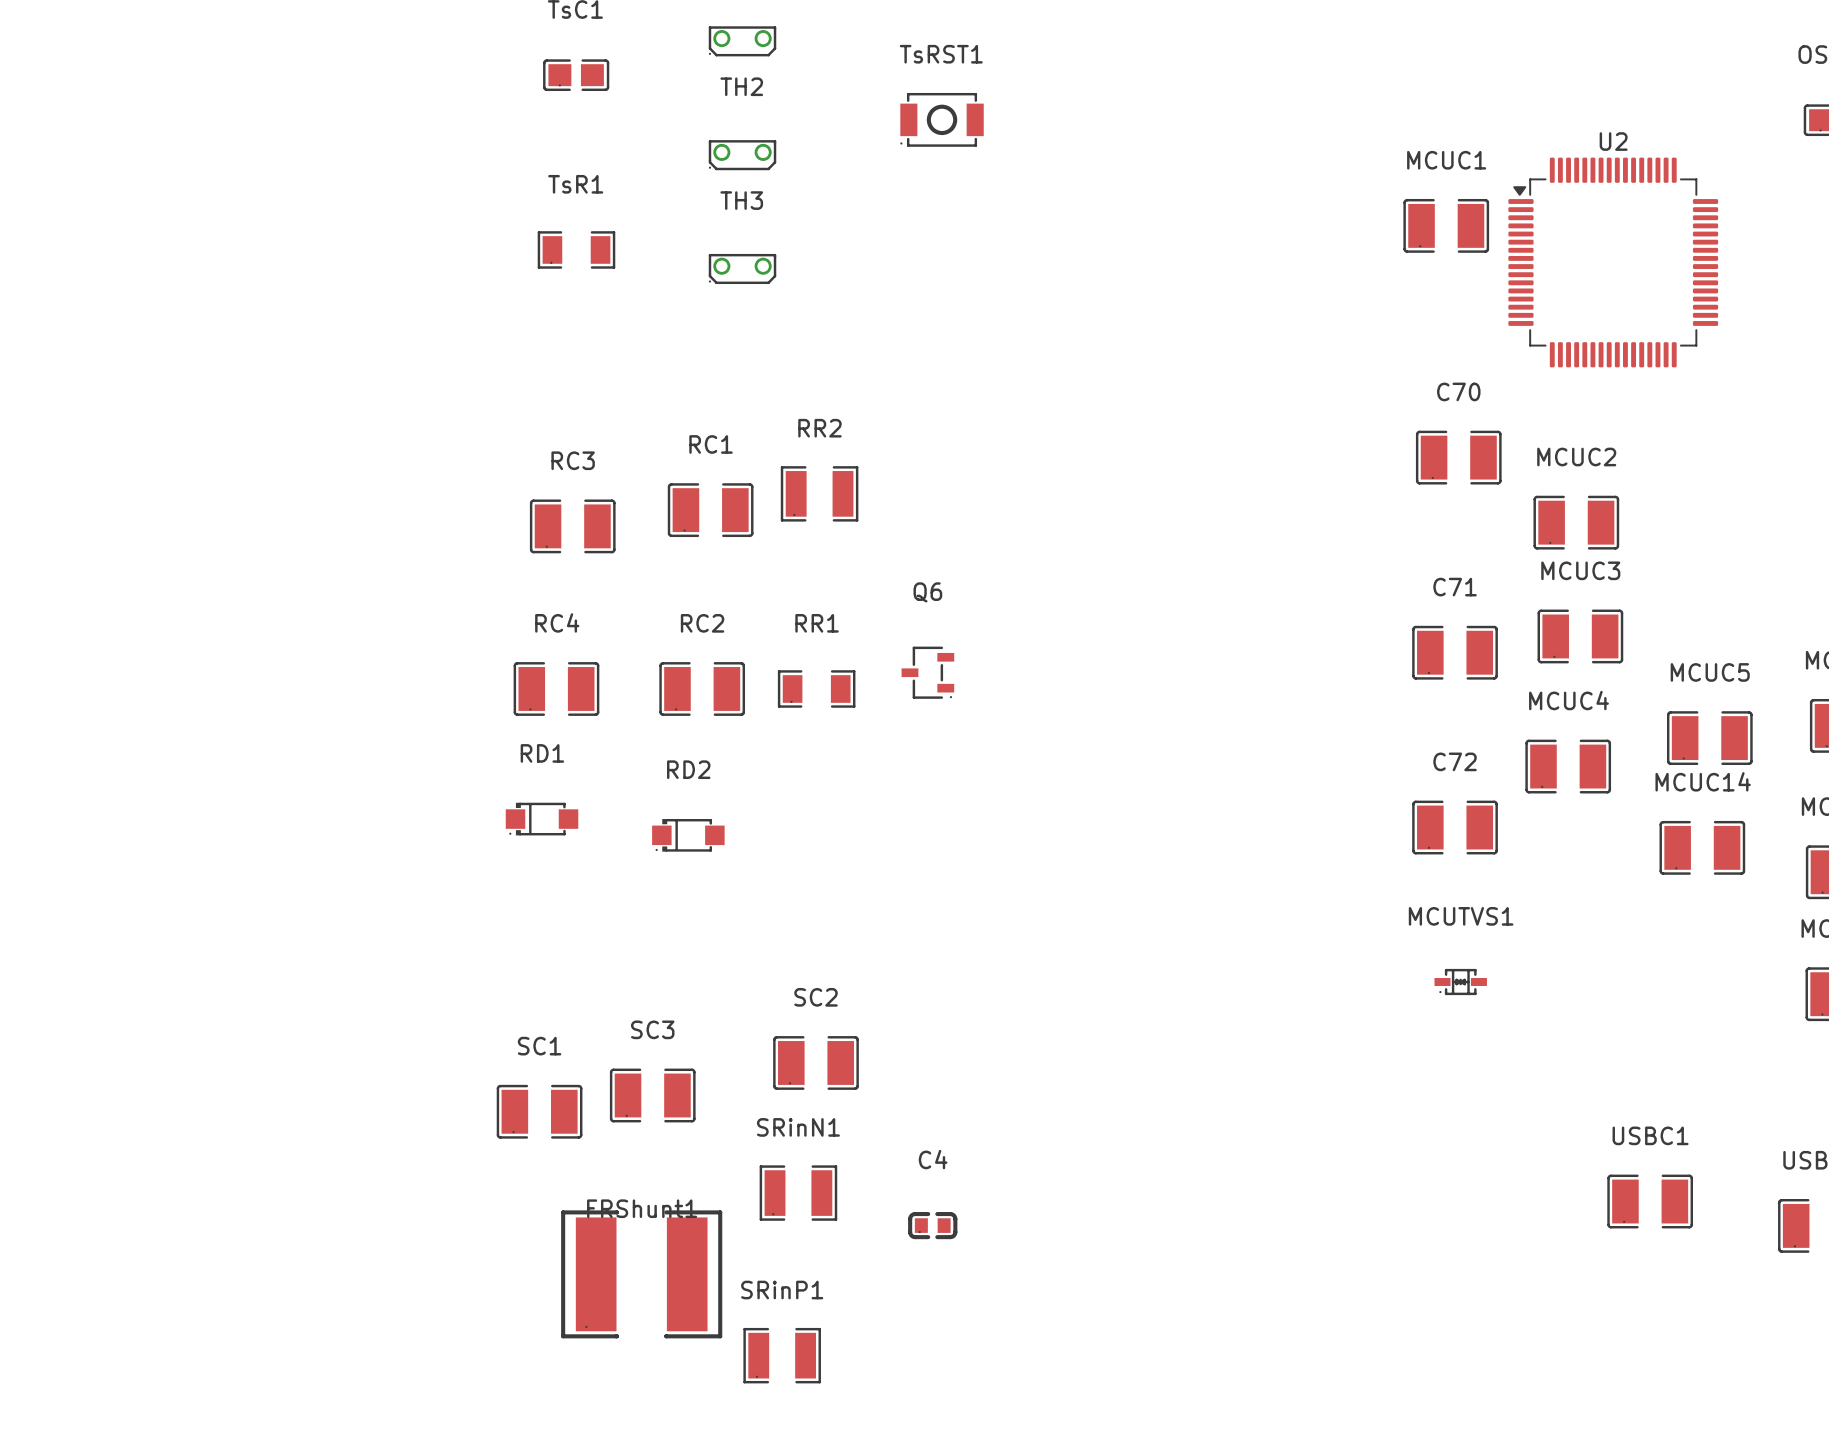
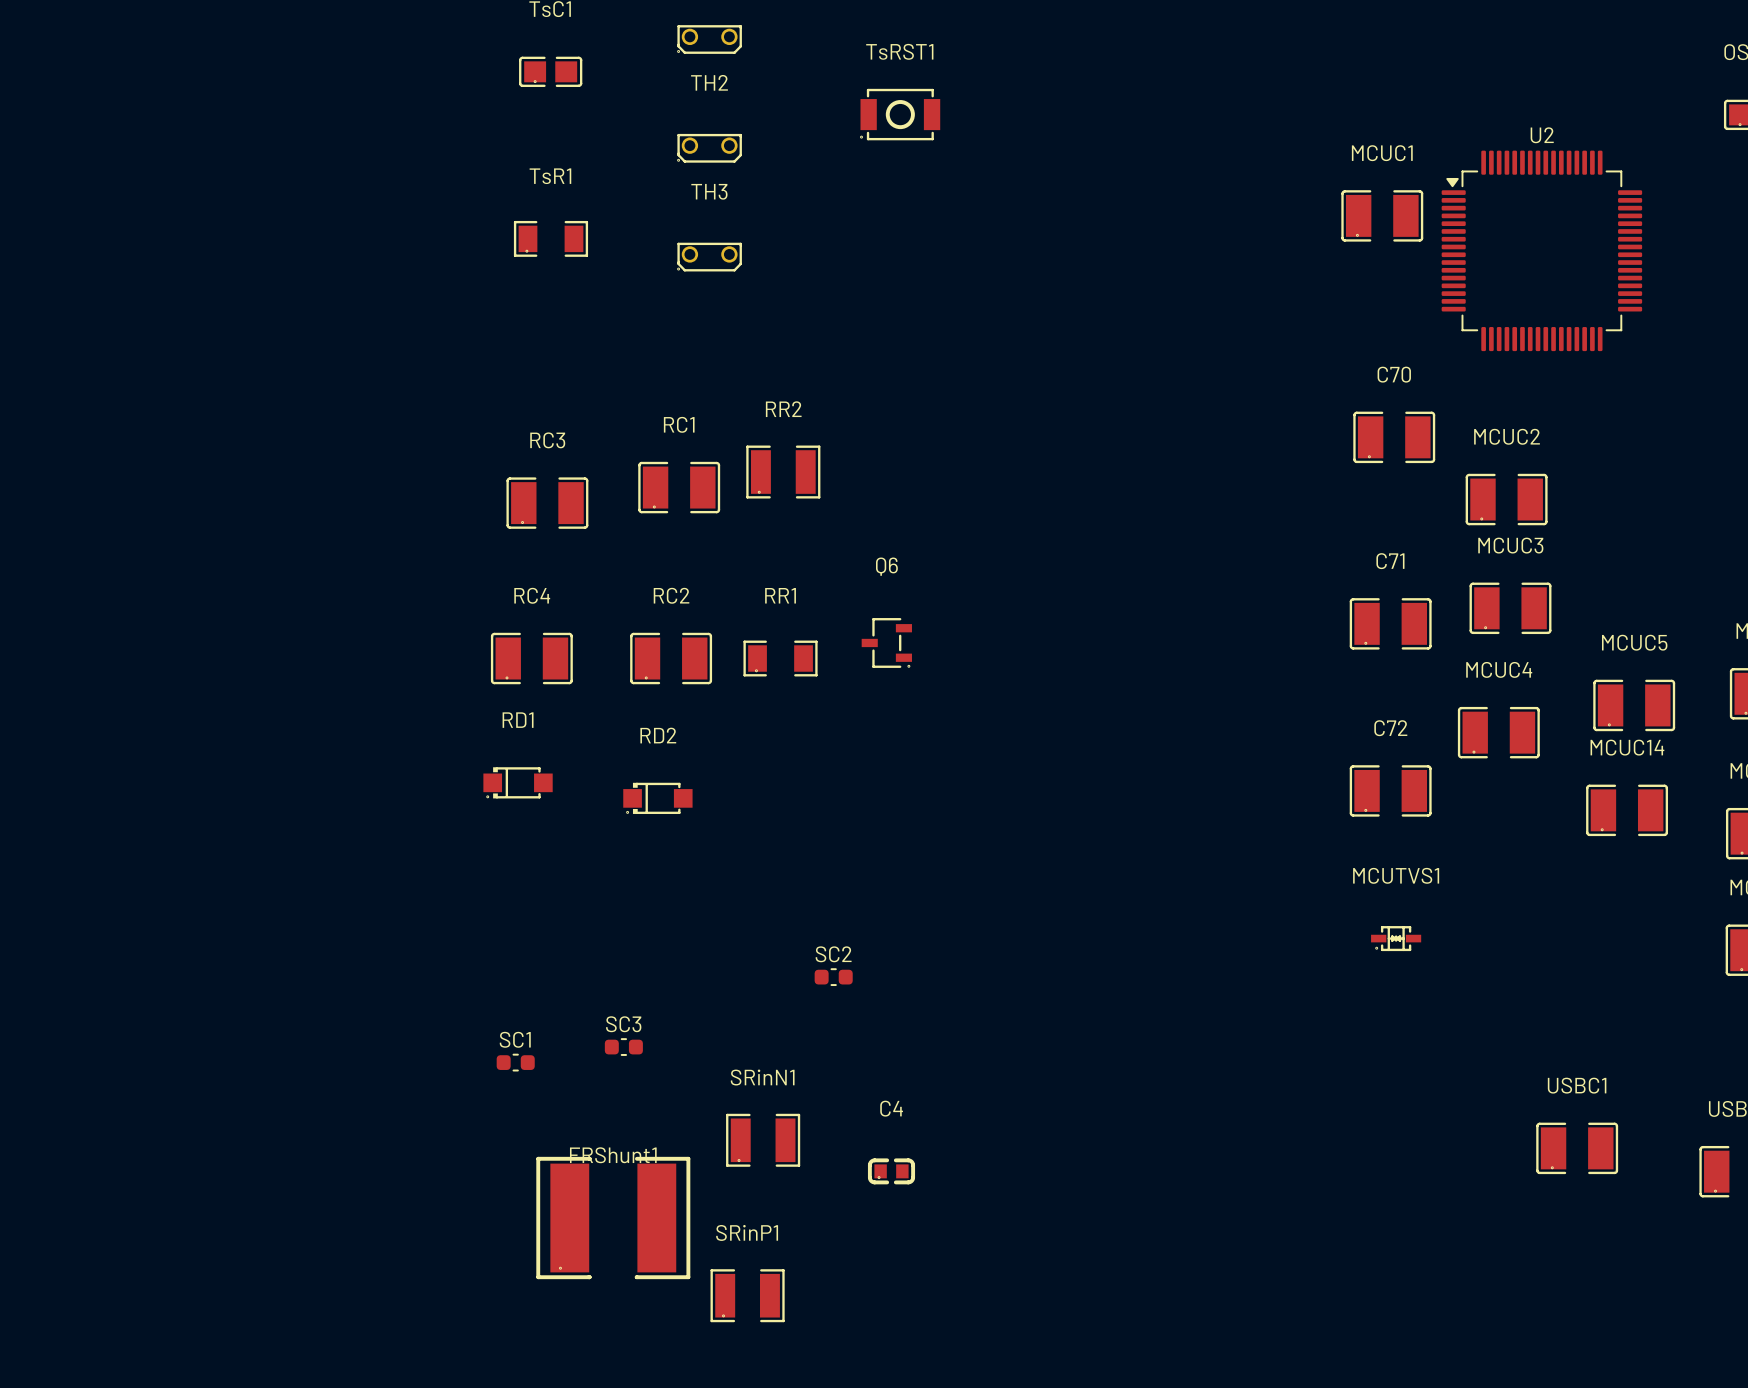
SC2 name position: SC2 (816, 997) -> SC2 (833, 954)
SC3 name position: SC3 (652, 1029) -> SC3 (623, 1024)
SC2 footprint: [773, 1036, 859, 1090] -> [814, 968, 853, 986]
SC1 name position: SC1 (539, 1046) -> SC1 (515, 1039)
SC3 footprint: [609, 1068, 696, 1123] -> [604, 1038, 643, 1056]
SC1 footprint: [496, 1084, 583, 1139] -> [496, 1053, 535, 1072]

